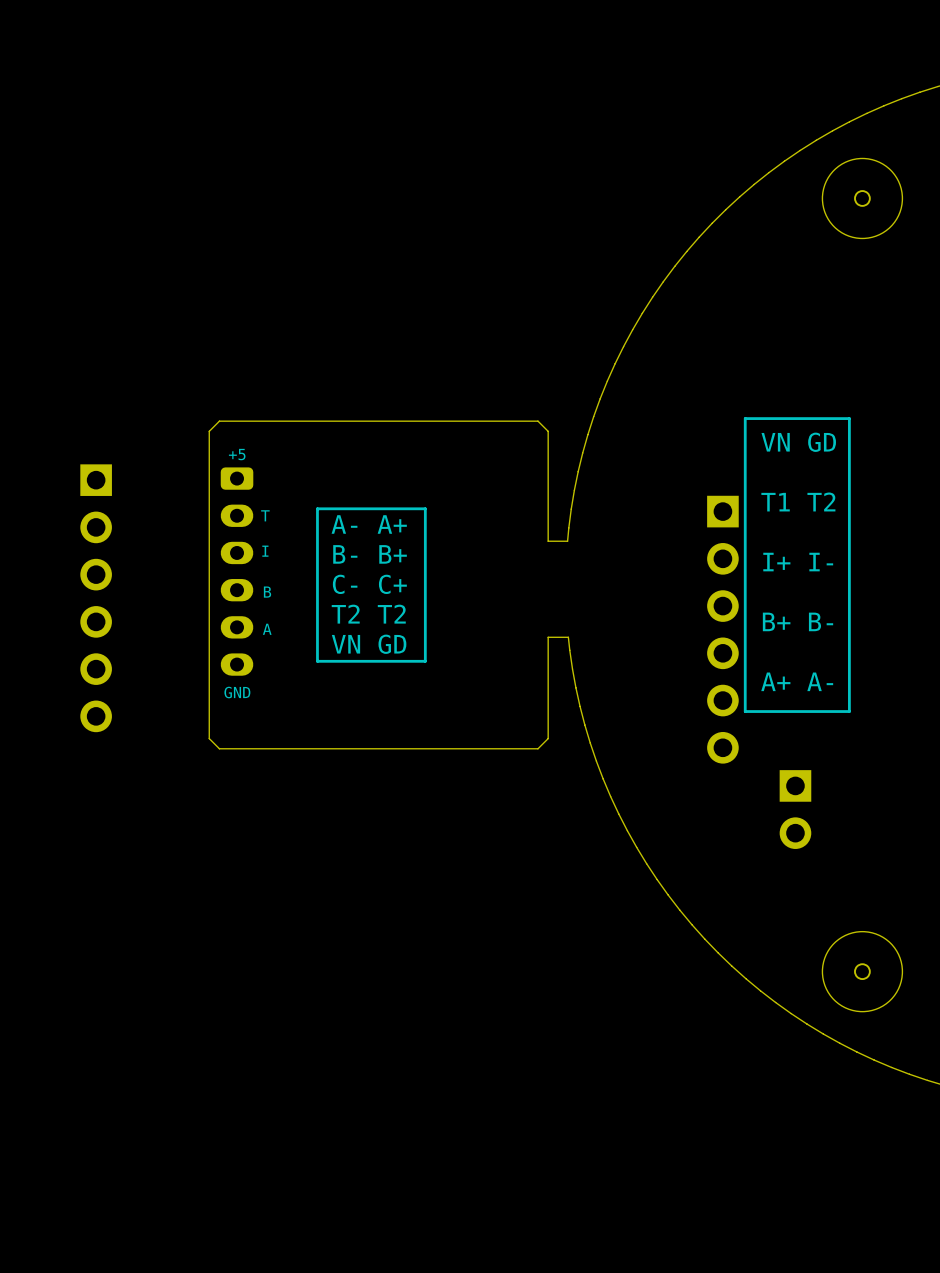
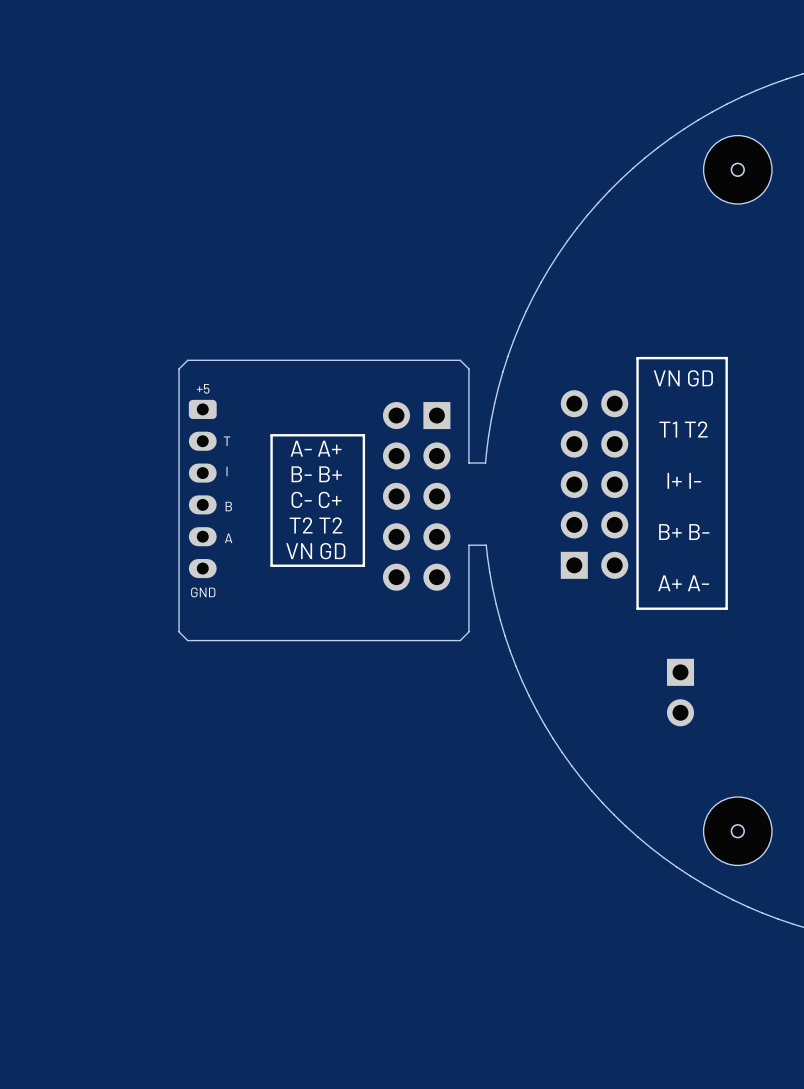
part: none -> (594, 484)
part: none -> (416, 496)
part: (96, 598) -> none
part: (722, 629) -> none

